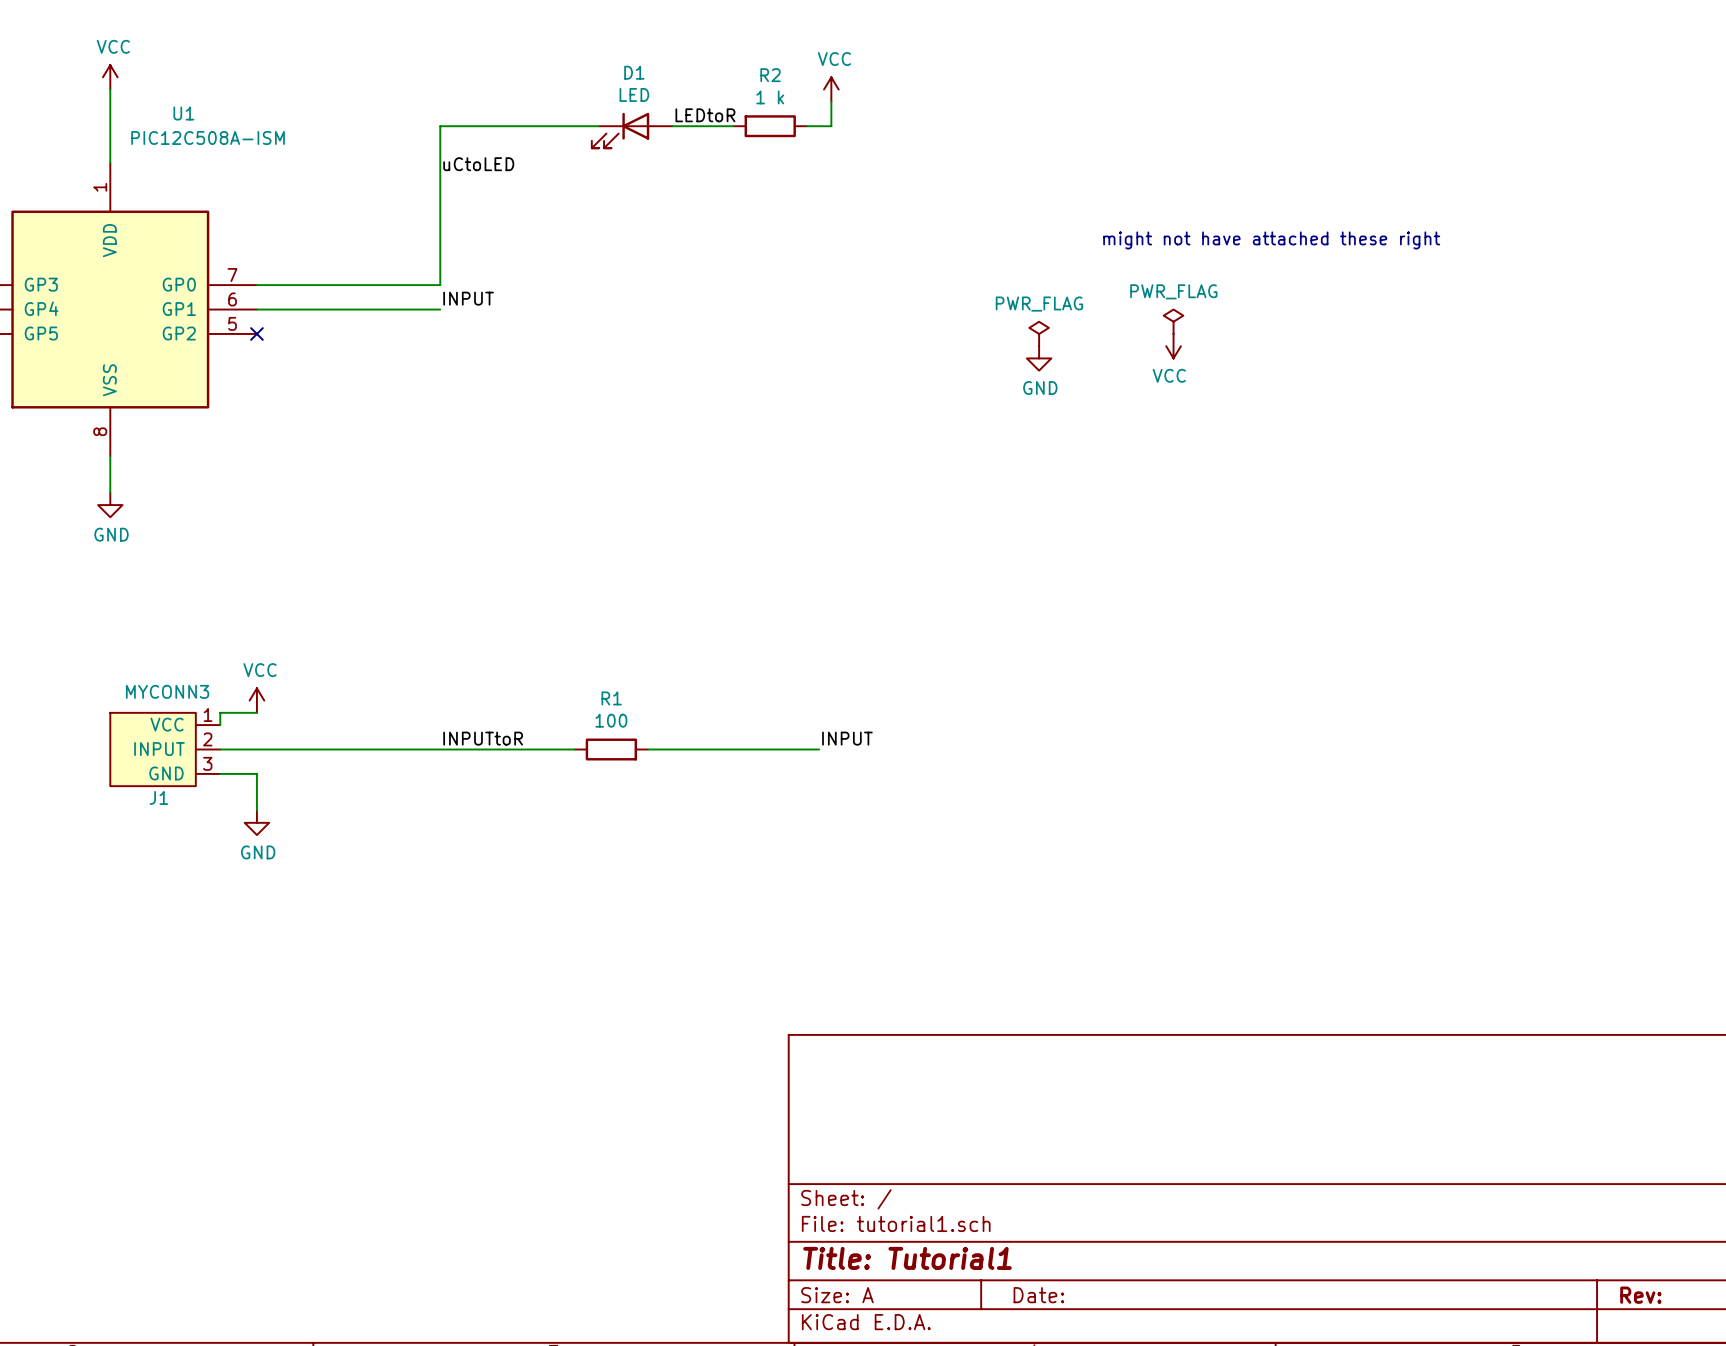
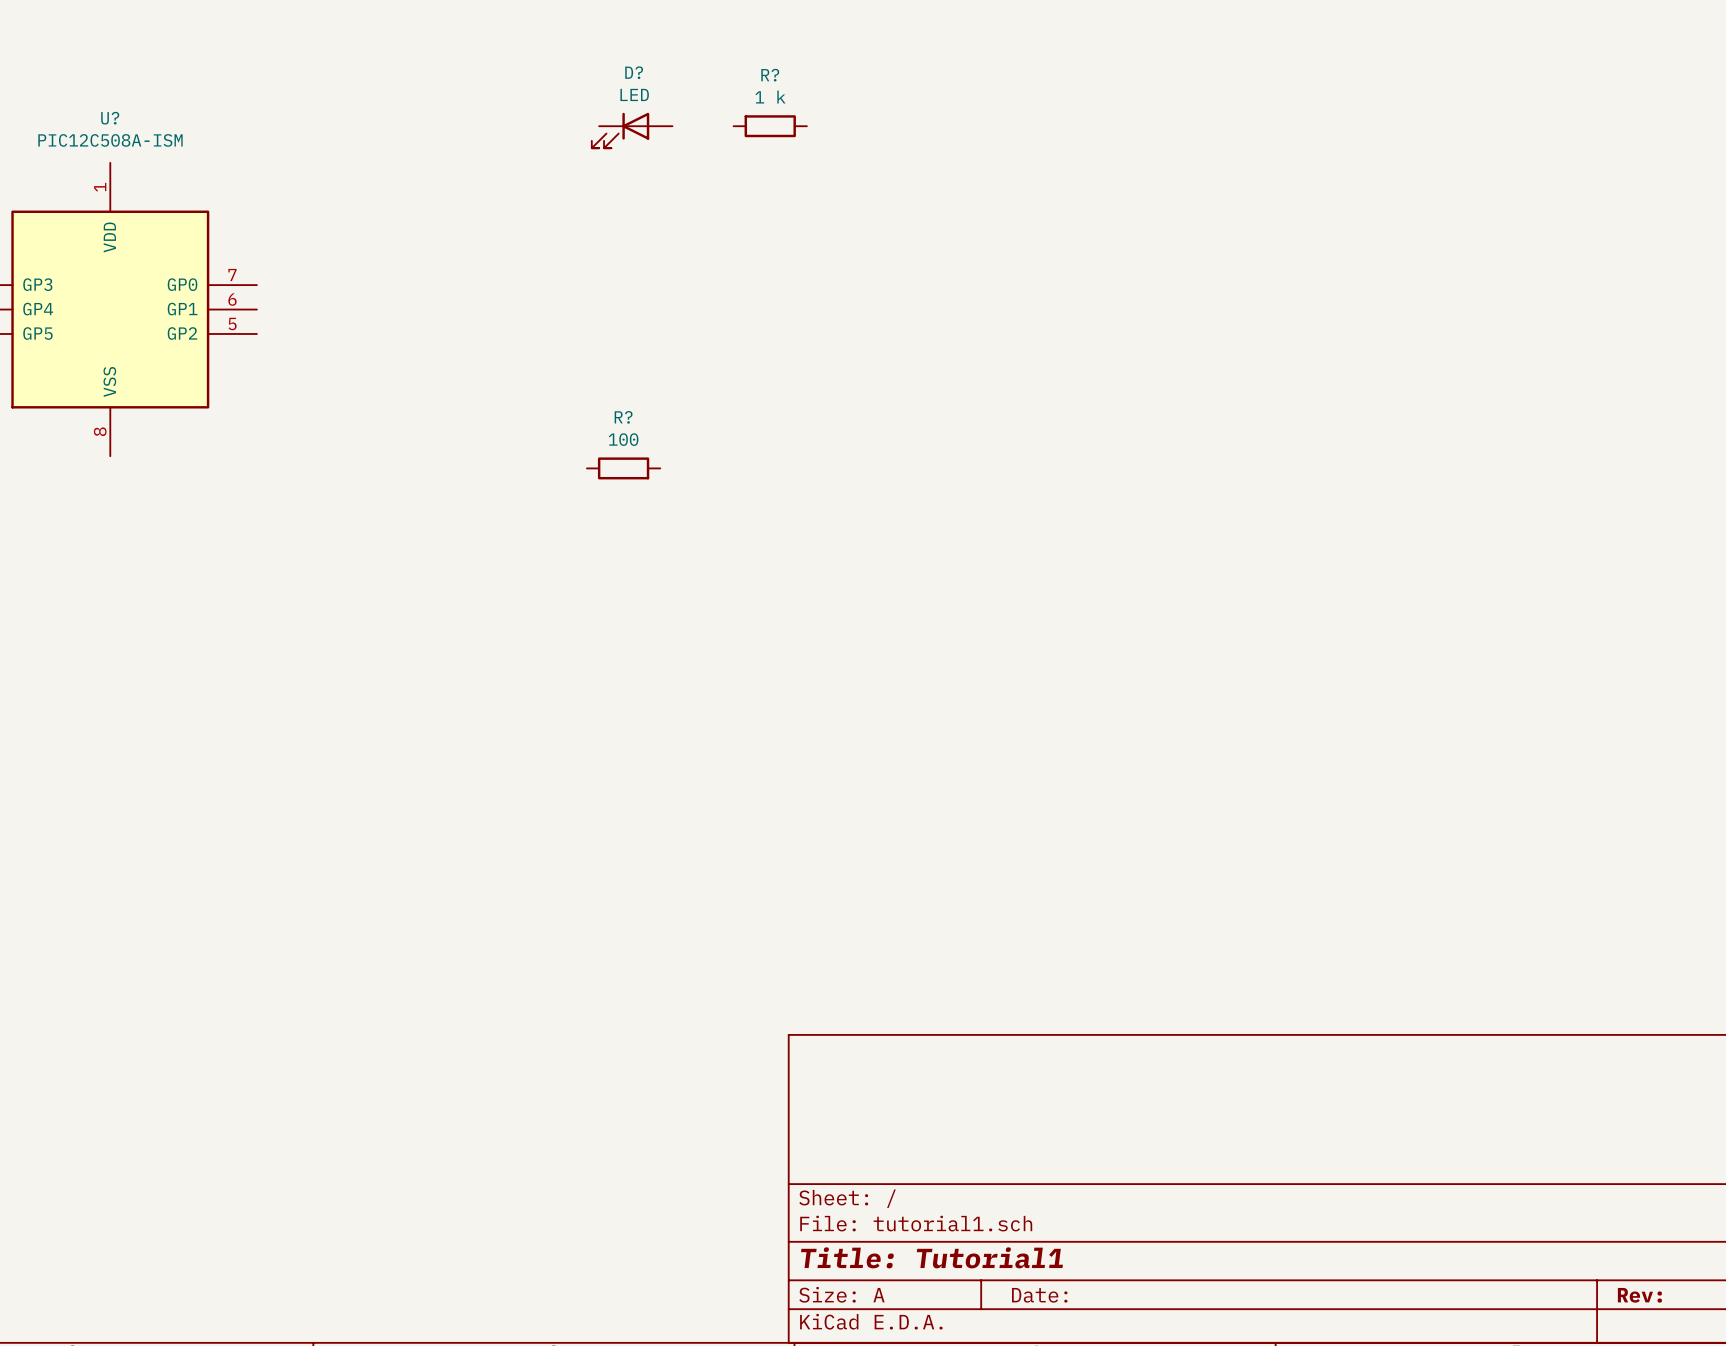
D1 name: D1 (634, 72) -> D? (634, 72)
R2 name: R2 (770, 75) -> R? (770, 75)
power symbol: VCC (110, 77) -> none
wire: (110, 89) (110, 162) -> none
power symbol: VCC (831, 89) -> none
wire: (831, 101) (831, 126) (806, 126) -> none
U1 name: U1 (183, 113) -> U? (110, 118)
label: LEDtoR (705, 115) -> none
wire: (599, 126) (440, 126) (440, 285) (256, 285) -> none
wire: (672, 126) (733, 126) -> none
U1 value position: PIC12C508A-ISM (208, 137) -> PIC12C508A-ISM (110, 140)
label: uCtoLED (478, 164) -> none
text: might not have attached these right (1271, 240) -> none
label: INPUT (468, 298) -> none
wire: (256, 309) (440, 309) -> none
power symbol: PWR_FLAG (1173, 321) -> none
no-connect mark: (256, 333) -> none
power symbol: PWR_FLAG (1039, 333) -> none
power symbol: VCC (1173, 346) -> none
power symbol: GND (1039, 358) -> none
wire: (110, 456) (110, 492) -> none
R?: none -> 100 (623, 468)
power symbol: GND (110, 505) -> none
power symbol: VCC (256, 700) -> none
wire: (256, 712) (220, 712) (220, 725) -> none
label: INPUTtoR (483, 738) -> none
label: INPUT (847, 738) -> none
J1: MYCONN3 (165, 749) -> none
wire: (220, 749) (574, 749) -> none
R1: 100 (611, 749) -> none
wire: (648, 749) (819, 749) -> none
wire: (220, 773) (256, 773) (256, 810) -> none
power symbol: GND (256, 822) -> none

